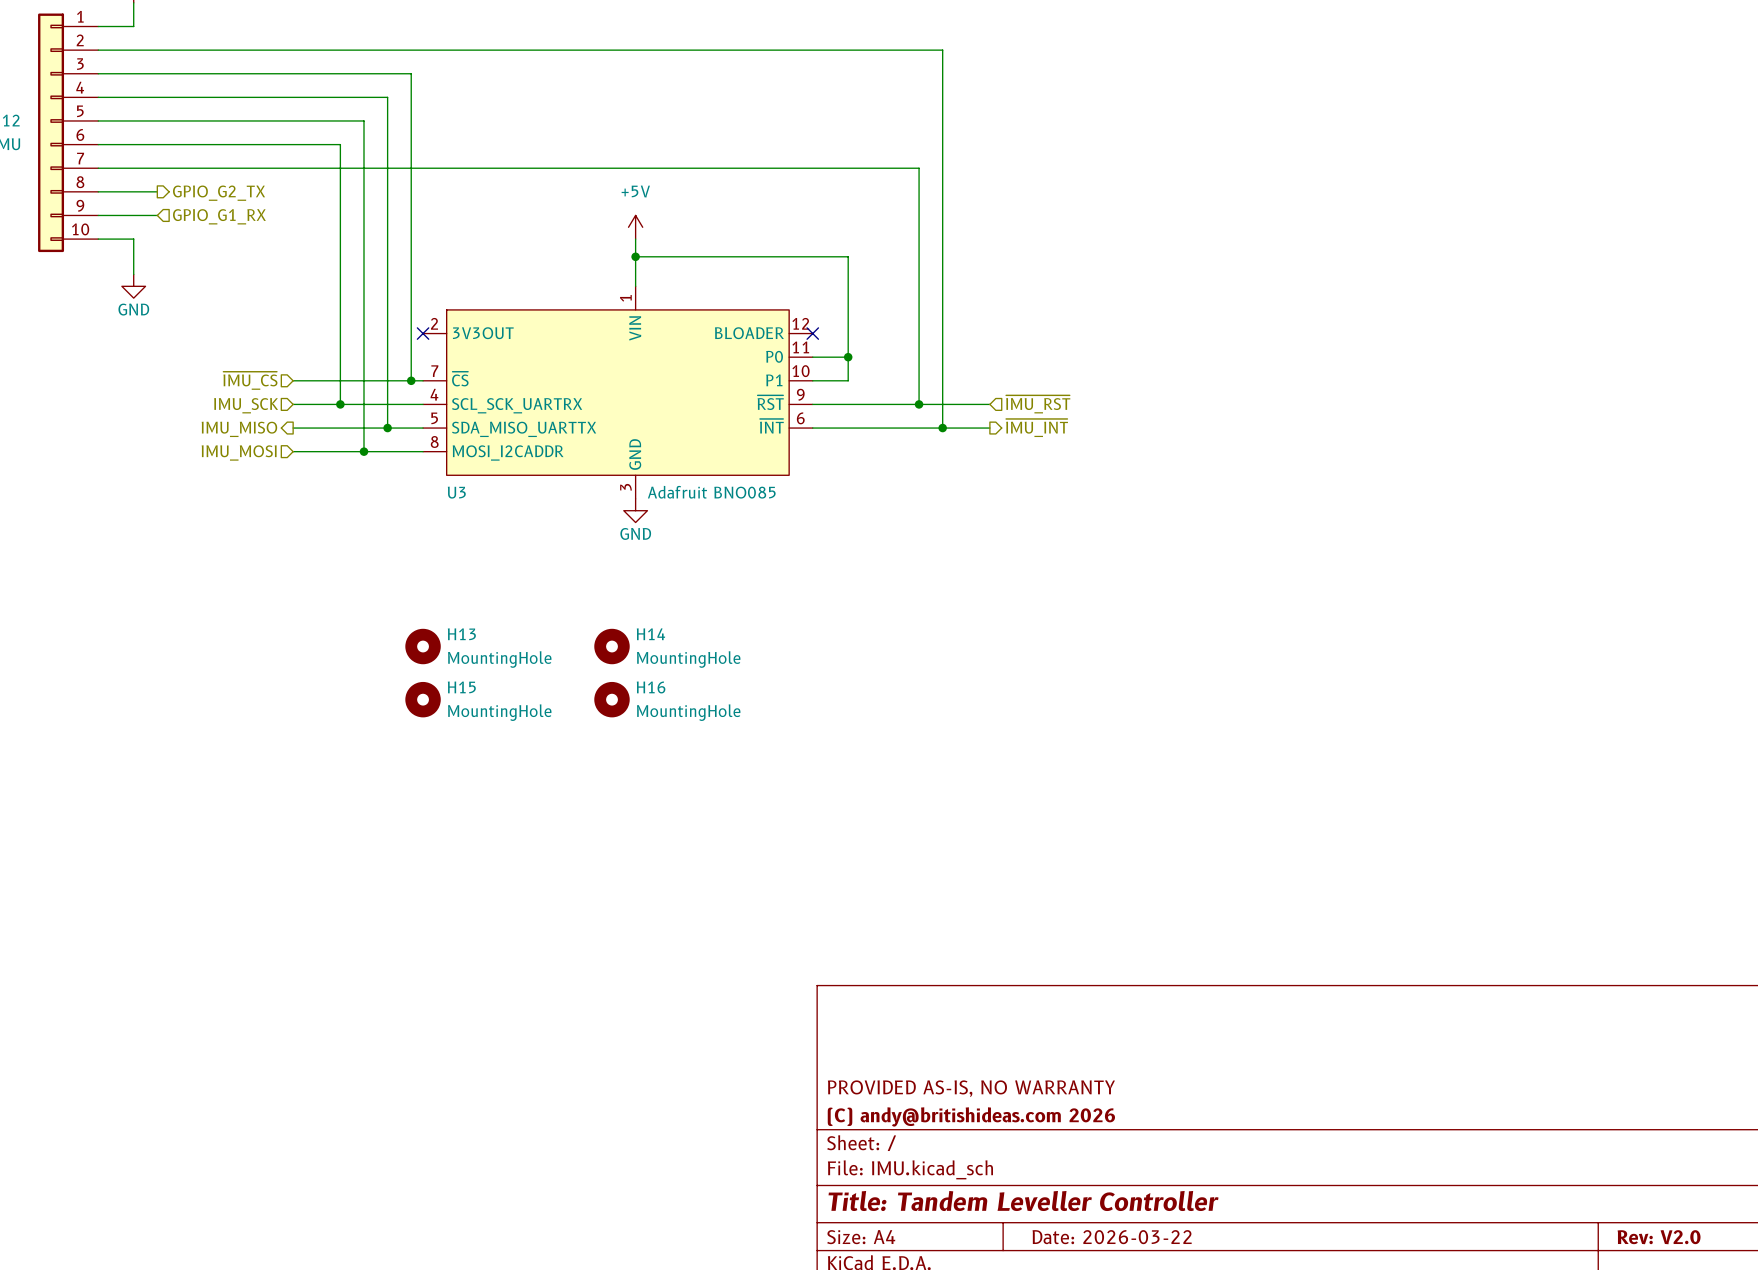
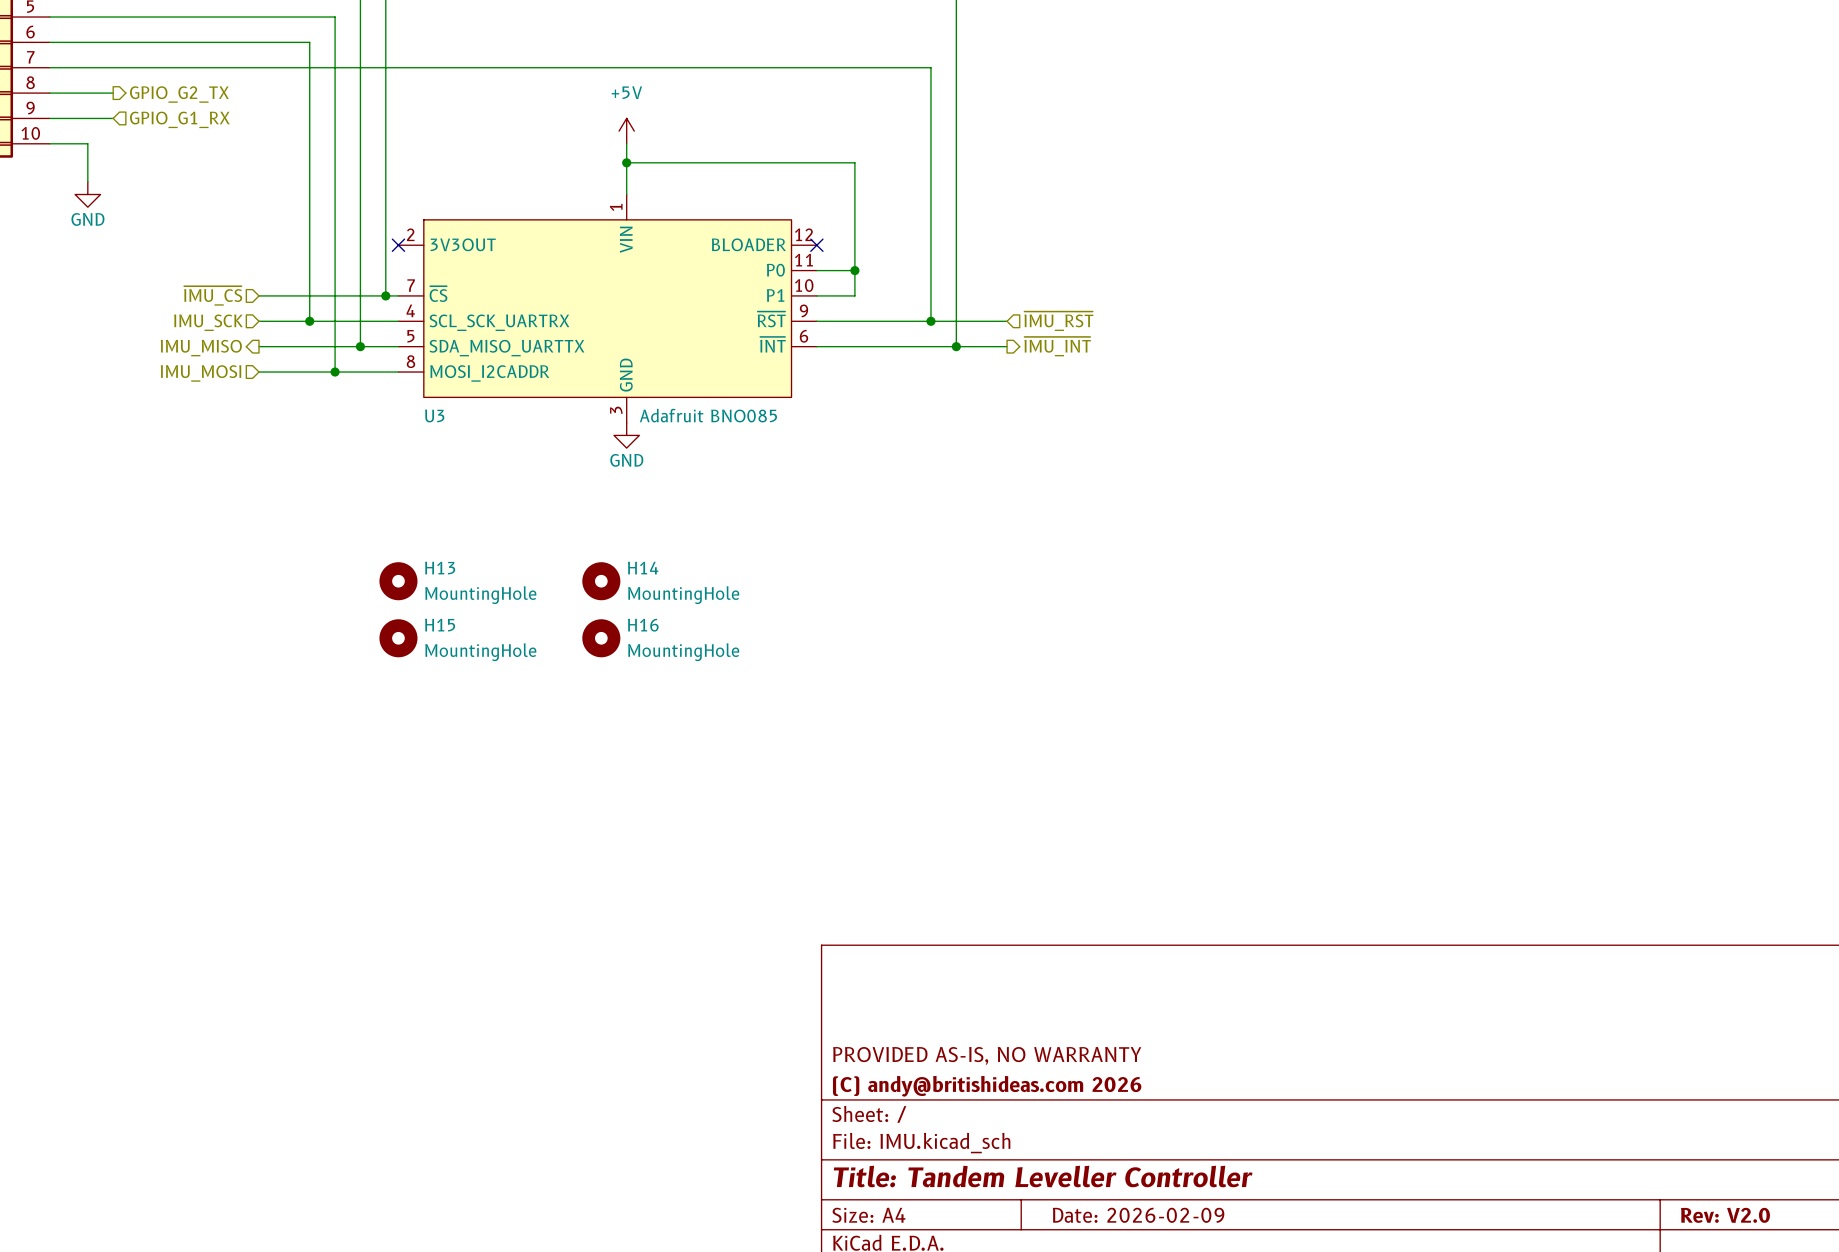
title block: Date: 2026-03-22 (1112, 1237) -> Date: 2026-02-09 (1138, 1215)

